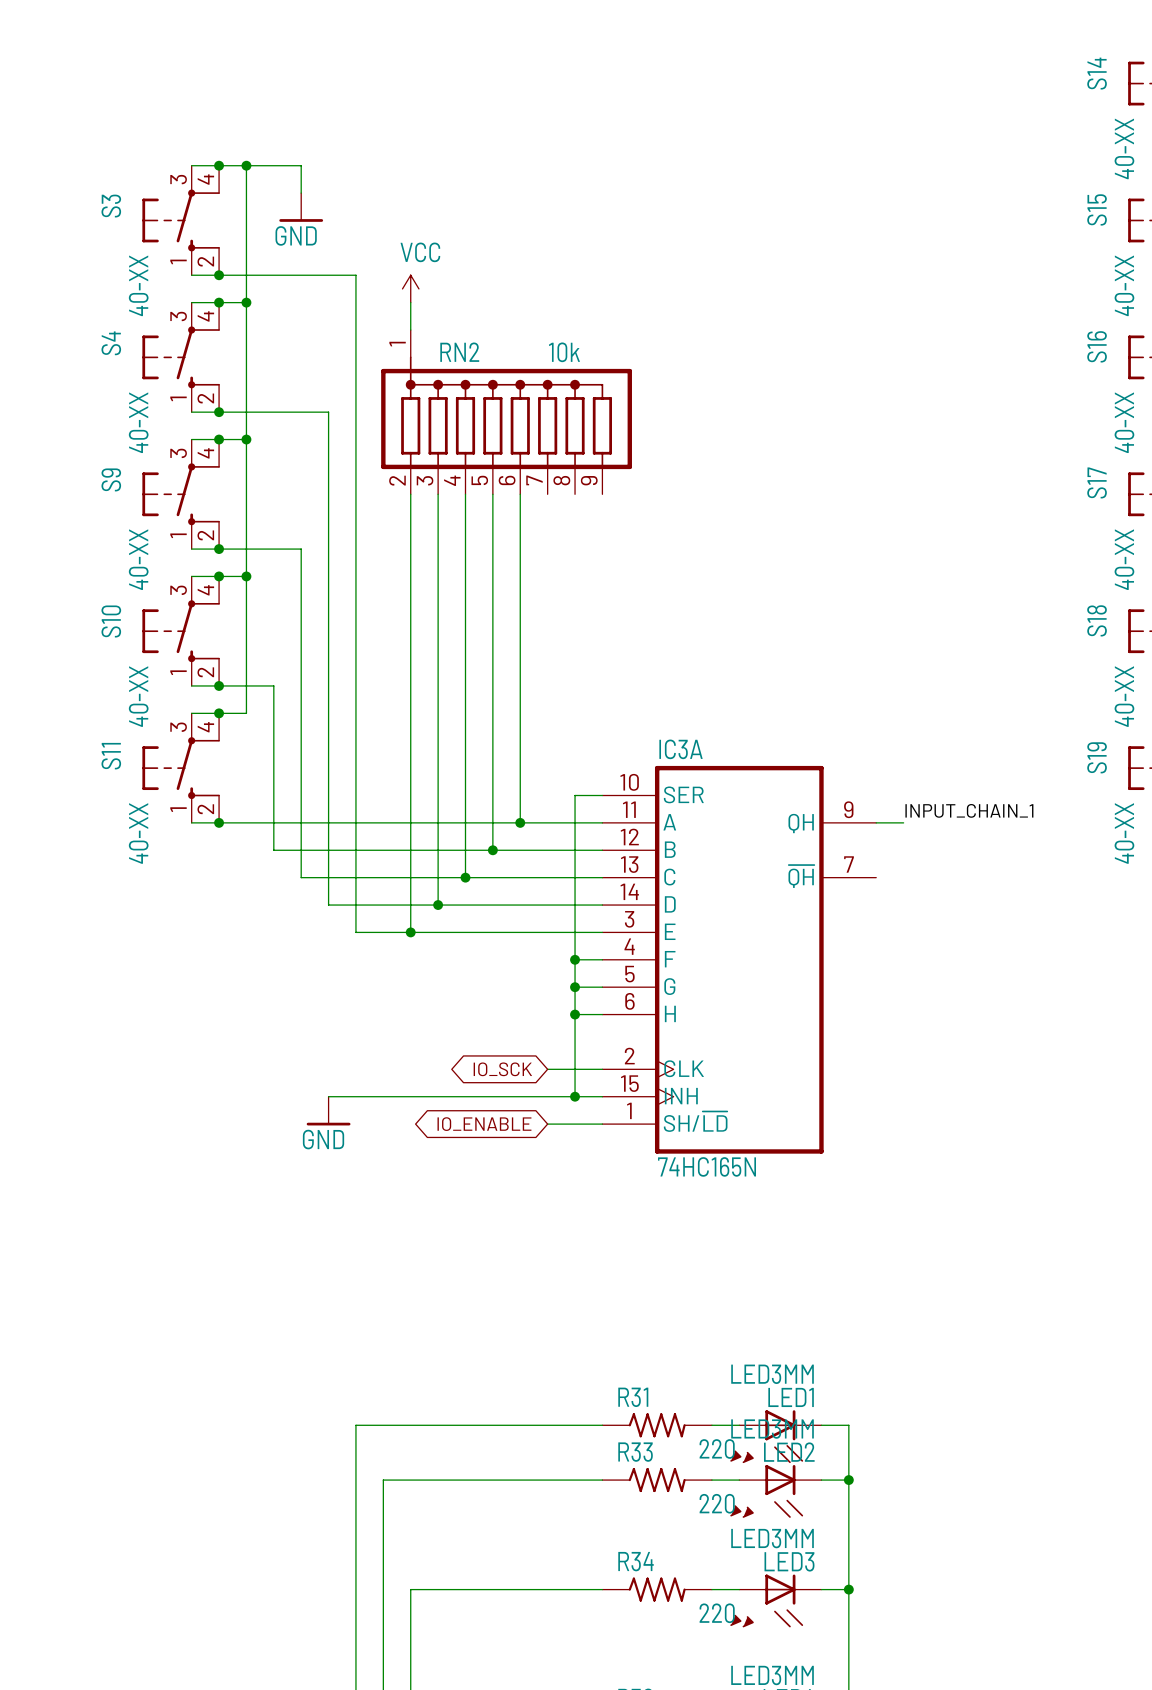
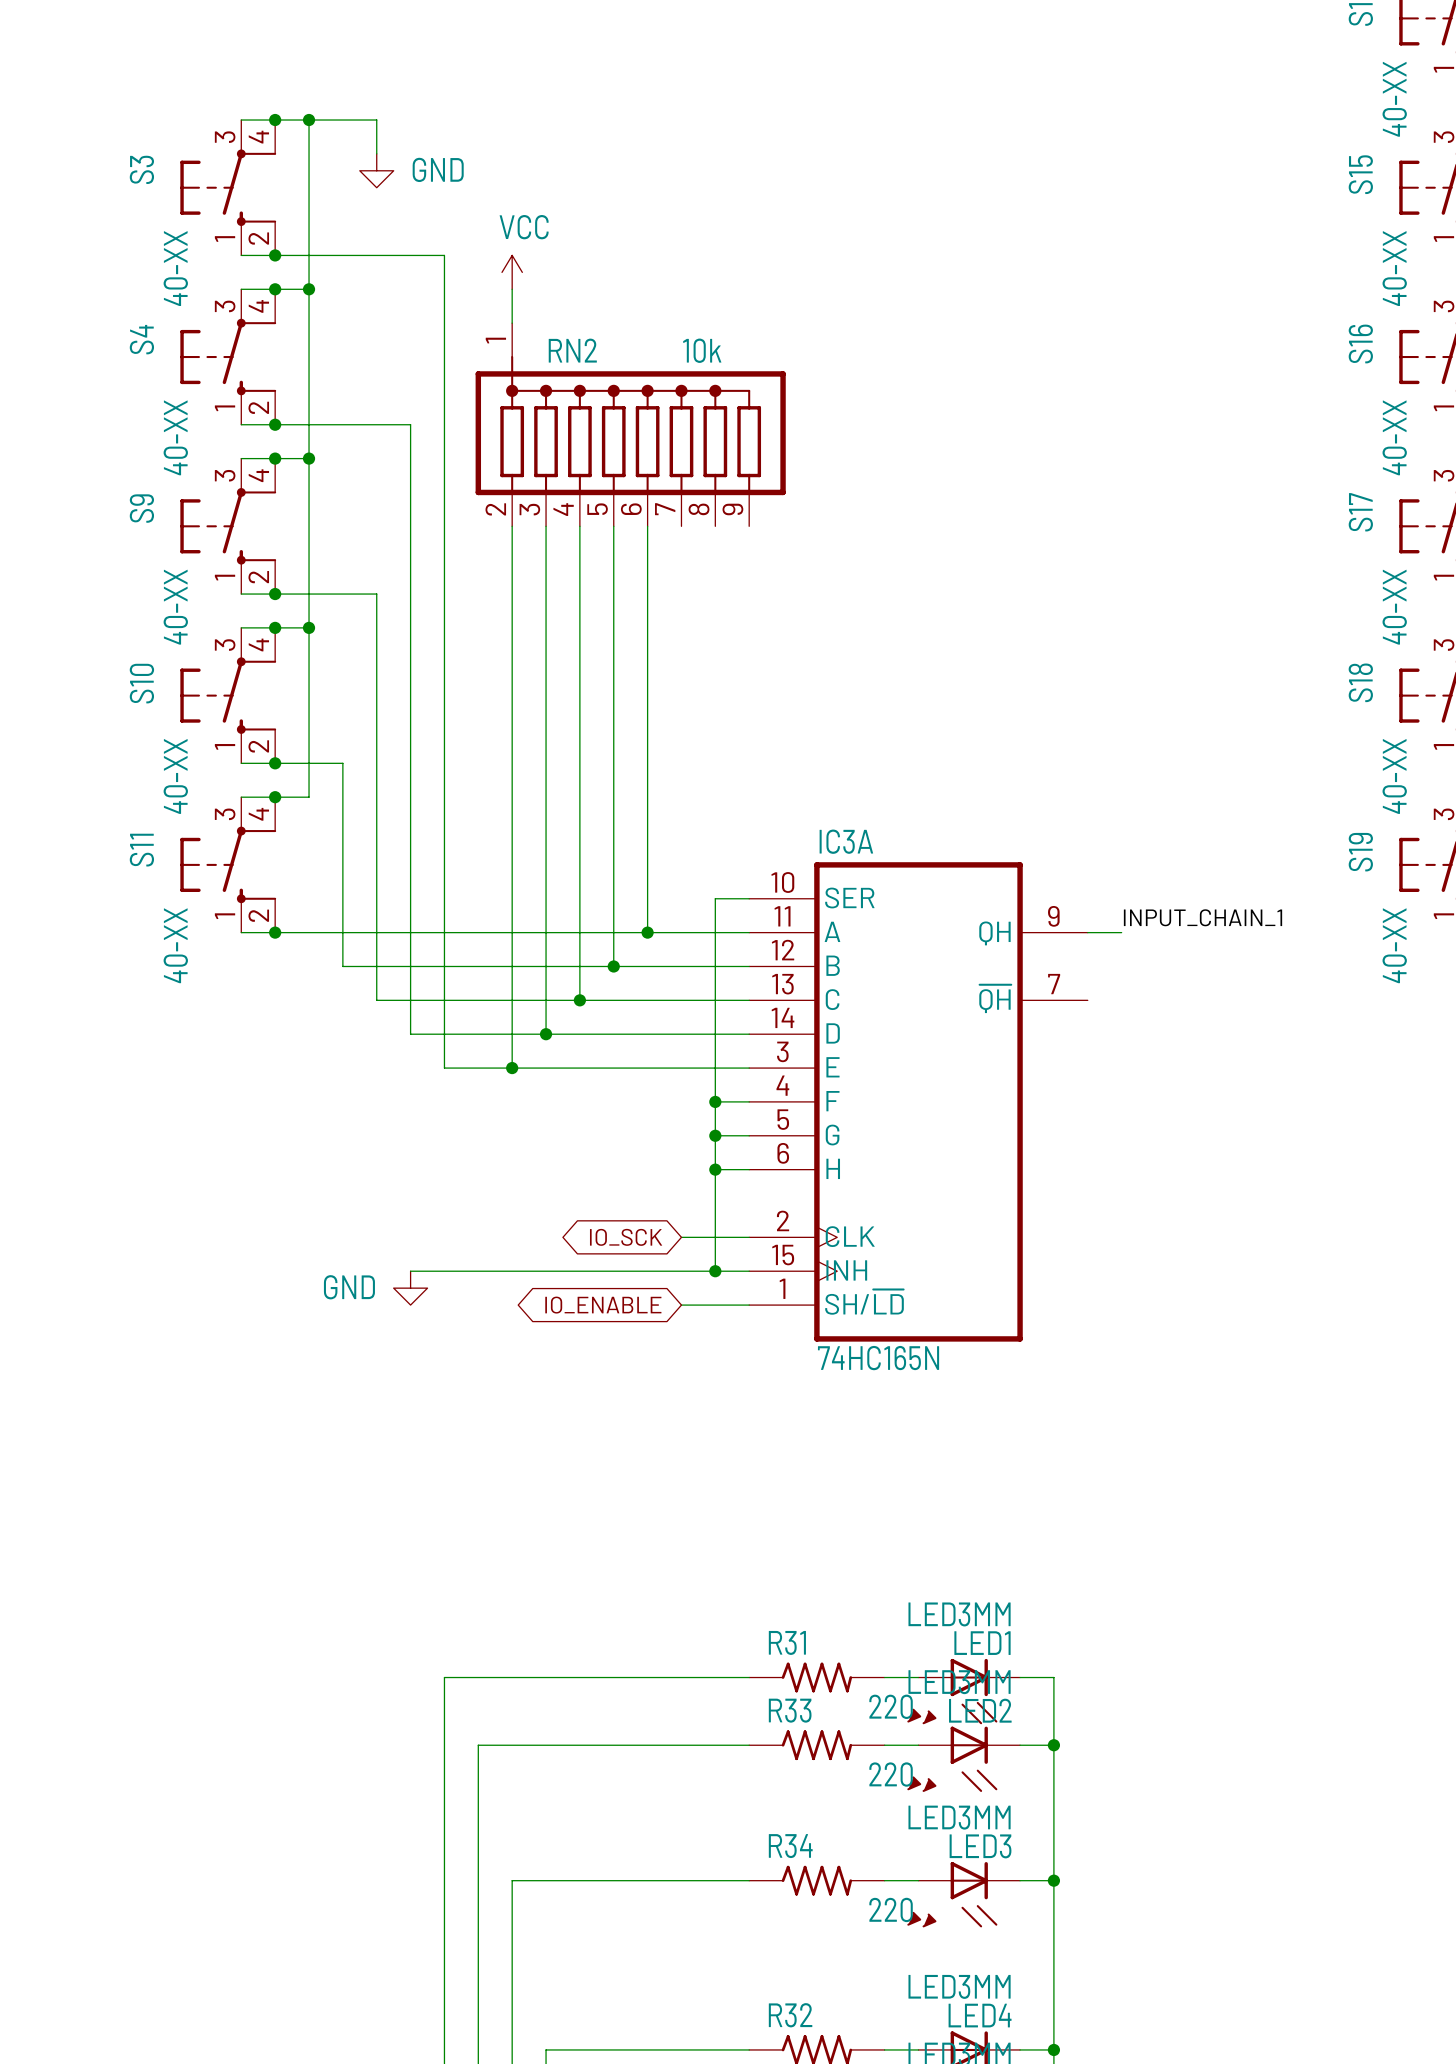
power symbol shape: [279, 193, 324, 222] -> [359, 153, 394, 188]
power symbol text position: GND (296, 235) -> GND (438, 169)
power symbol shape: [306, 1096, 351, 1126] -> [393, 1271, 428, 1306]
power symbol text position: GND (323, 1139) -> GND (349, 1287)

